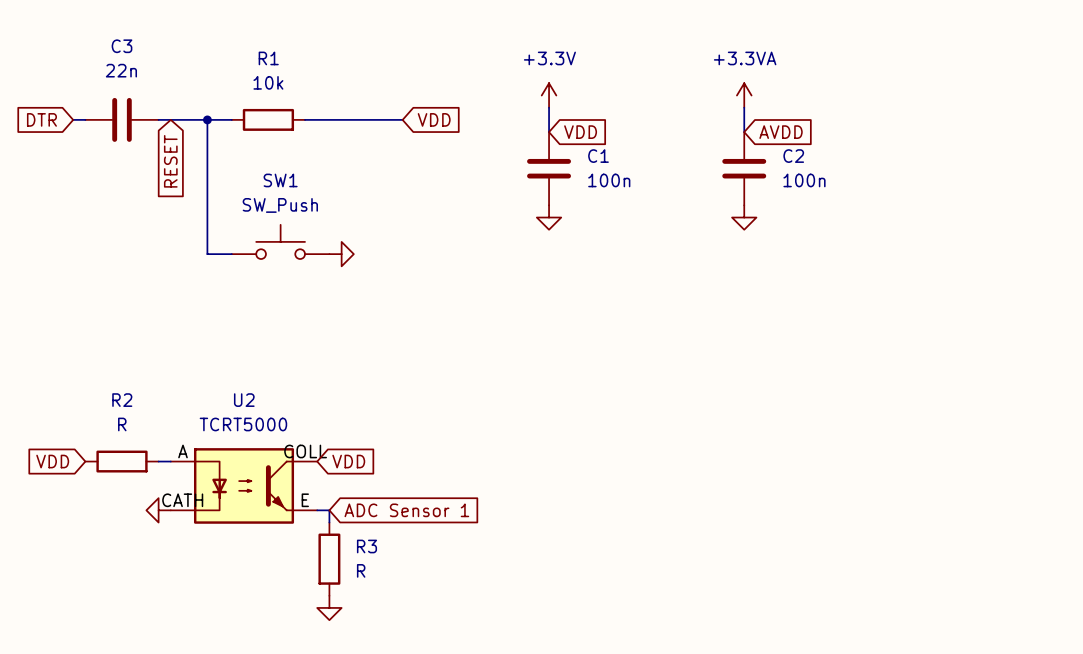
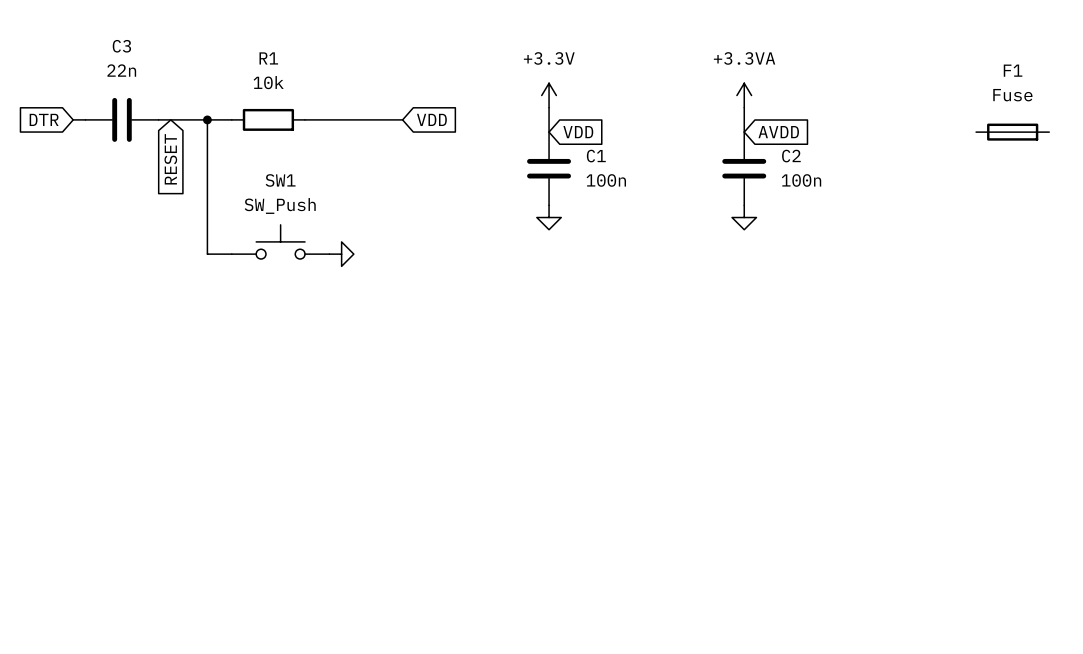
F1: none -> Fuse (1012, 132)
global label: VDD (52, 461) -> none
R2: R (122, 461) -> none
wire: (158, 461) (170, 461) -> none
global label: VDD (348, 461) -> none
U2: TCRT5000 (244, 485) -> none
power symbol: (158, 510) -> none
wire: (317, 510) (329, 510) (329, 522) -> none
global label: ADC Sensor 1 (406, 510) -> none
R3: R (329, 559) -> none
power symbol: (329, 607) -> none

